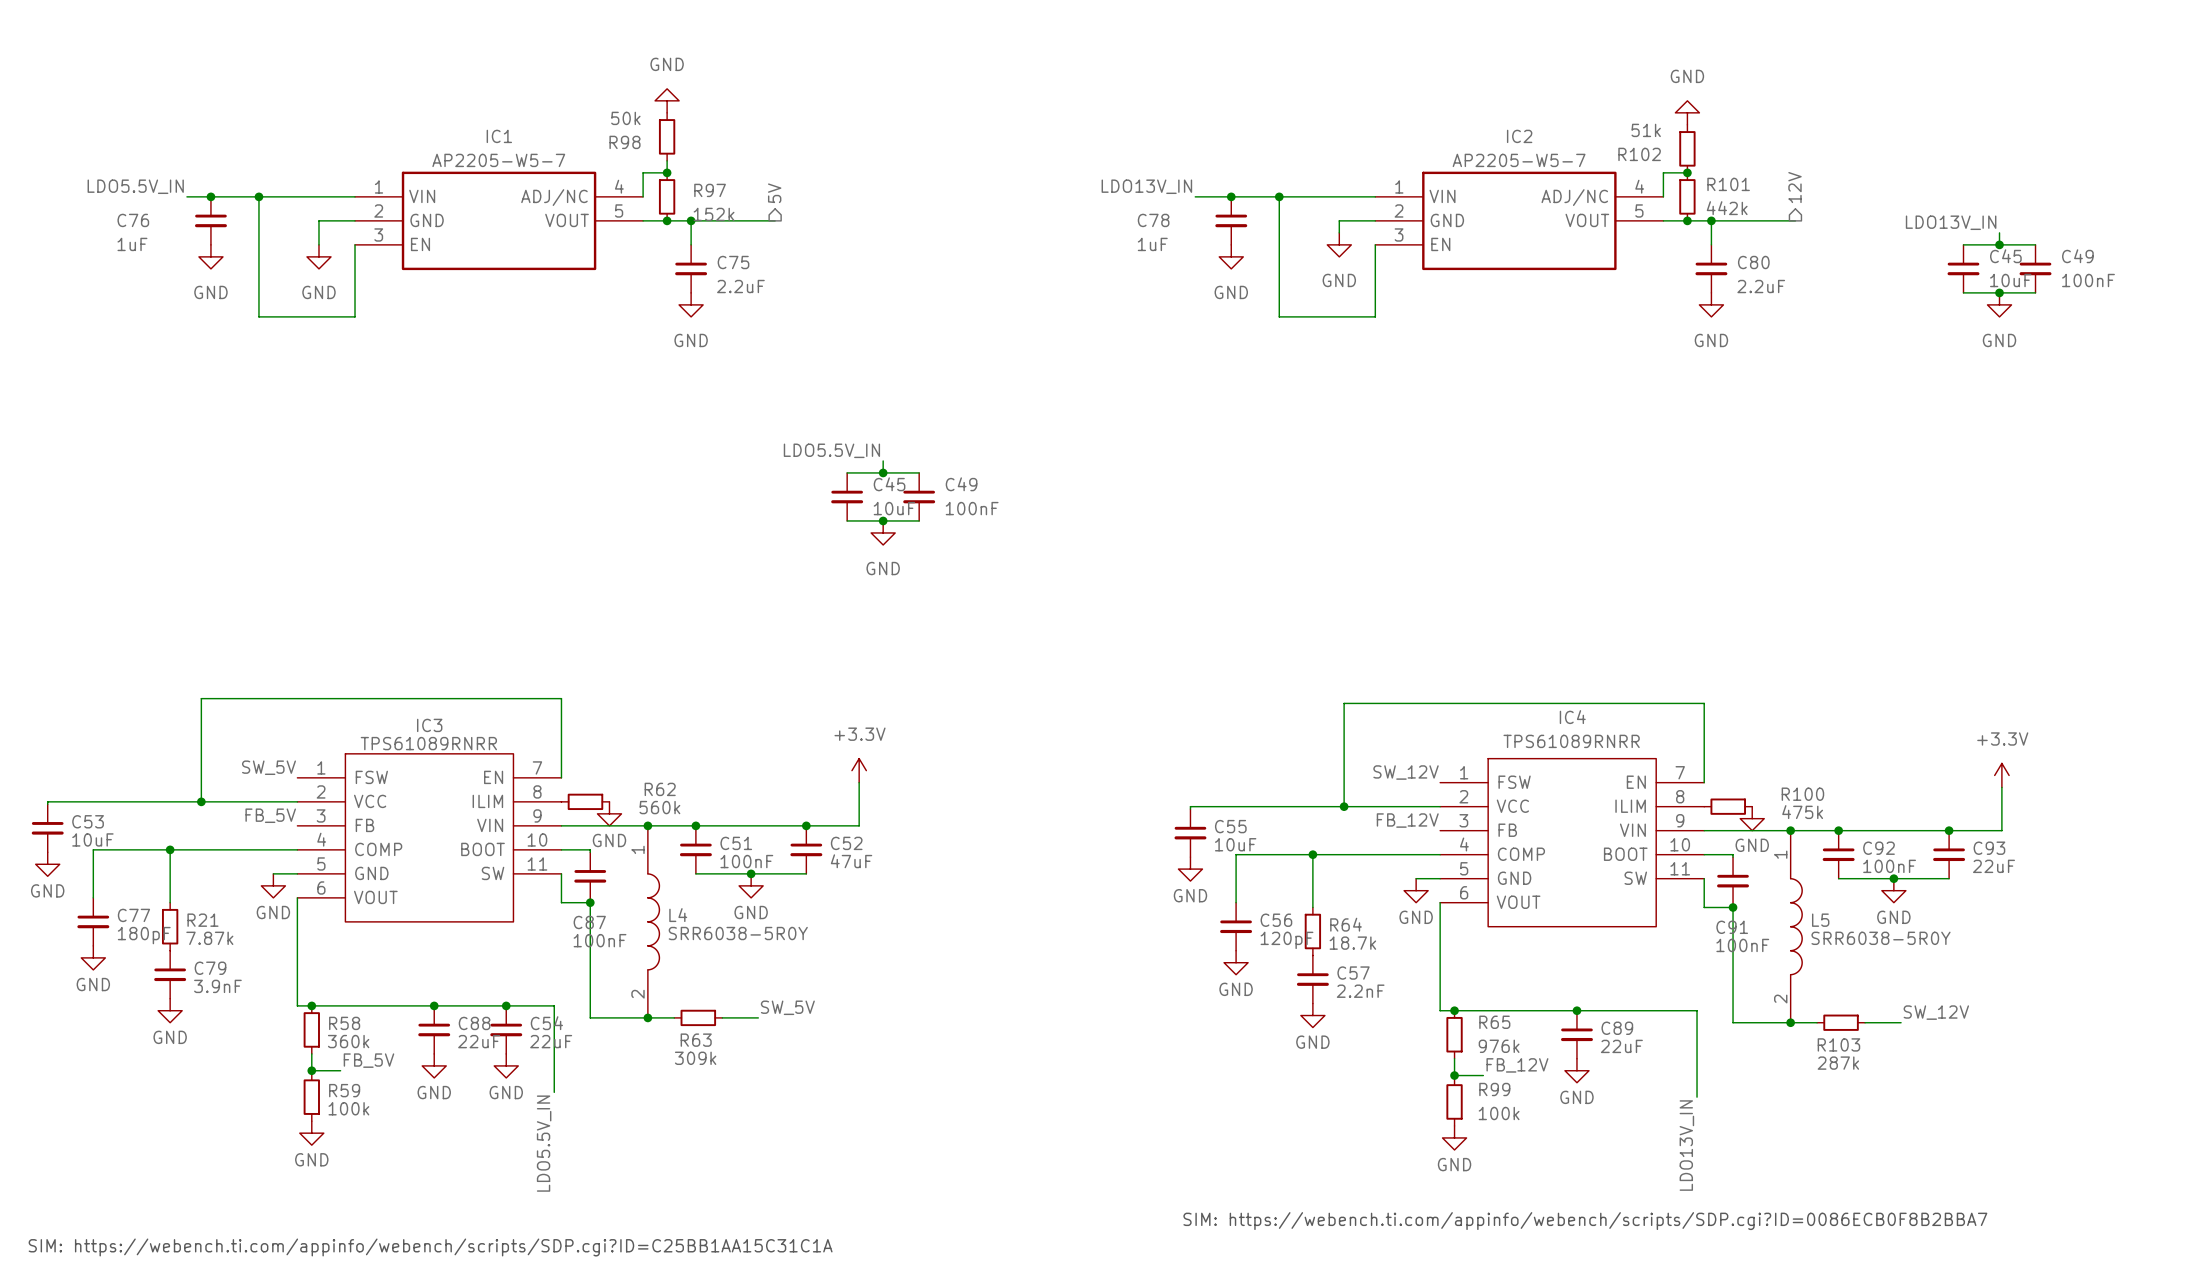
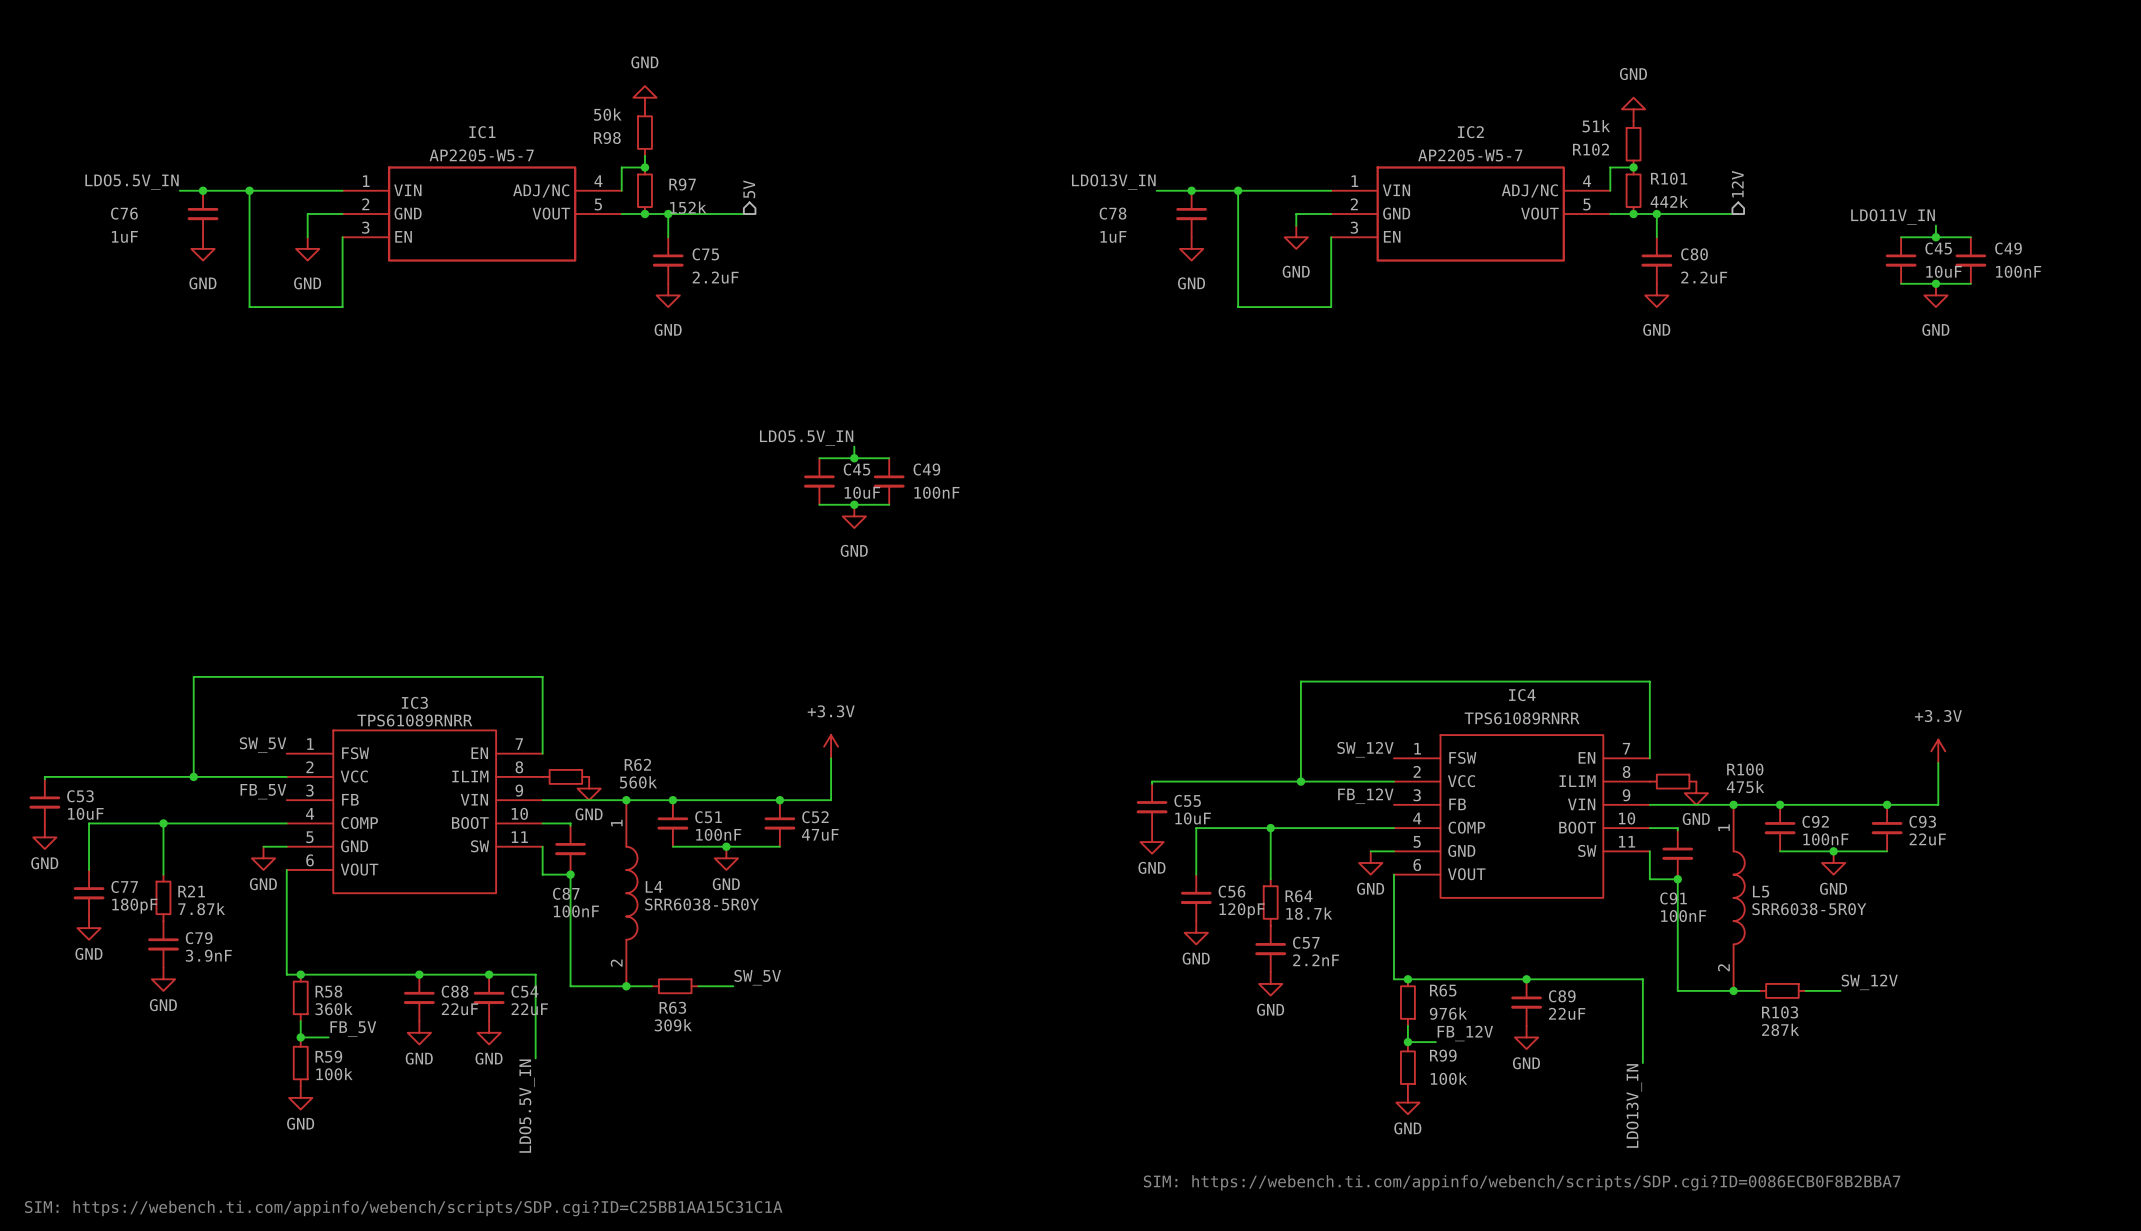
label: LDO13V_IN (1951, 222) -> LDO11V_IN (1893, 217)

